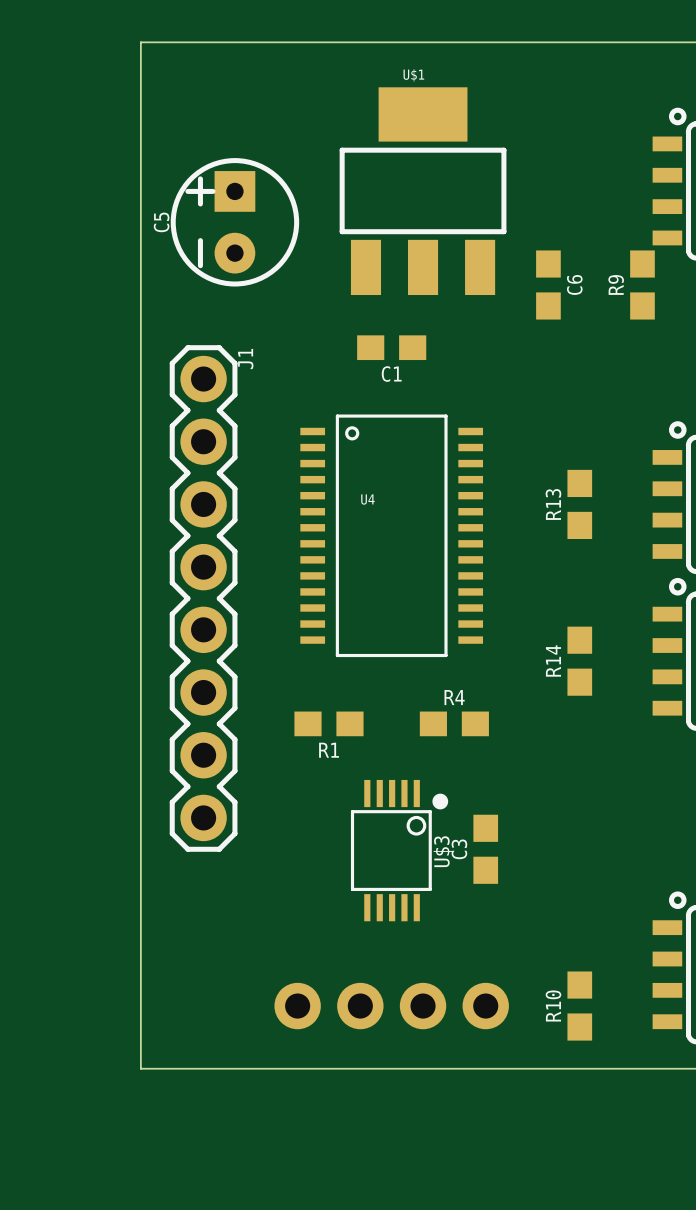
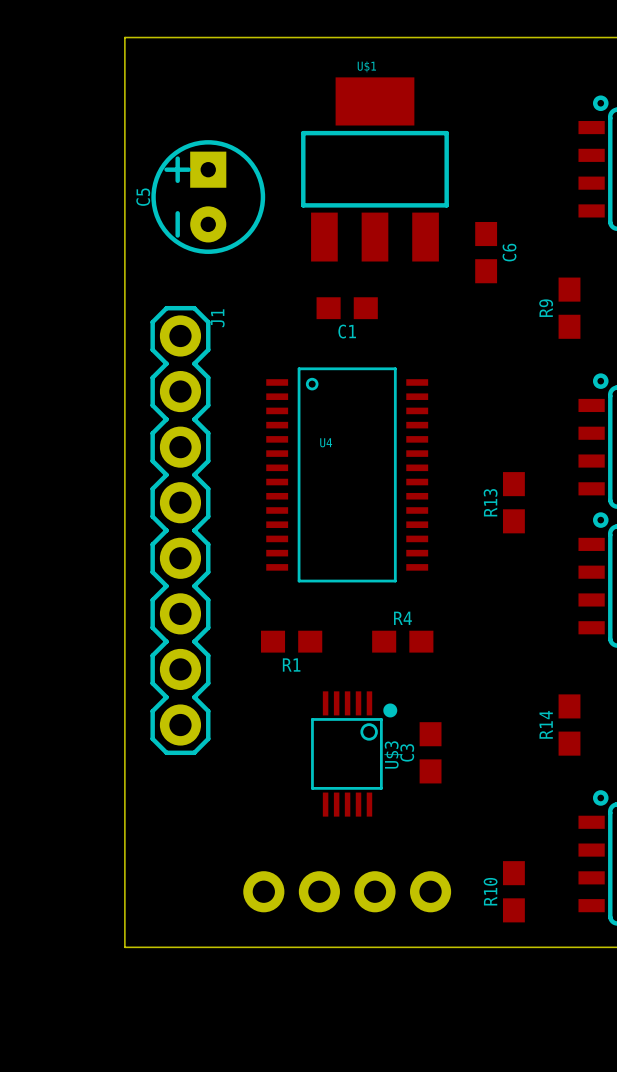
R9 position: (642, 284) -> (569, 308)
R13 position: (579, 504) -> (513, 502)
R14 position: (579, 661) -> (569, 725)

